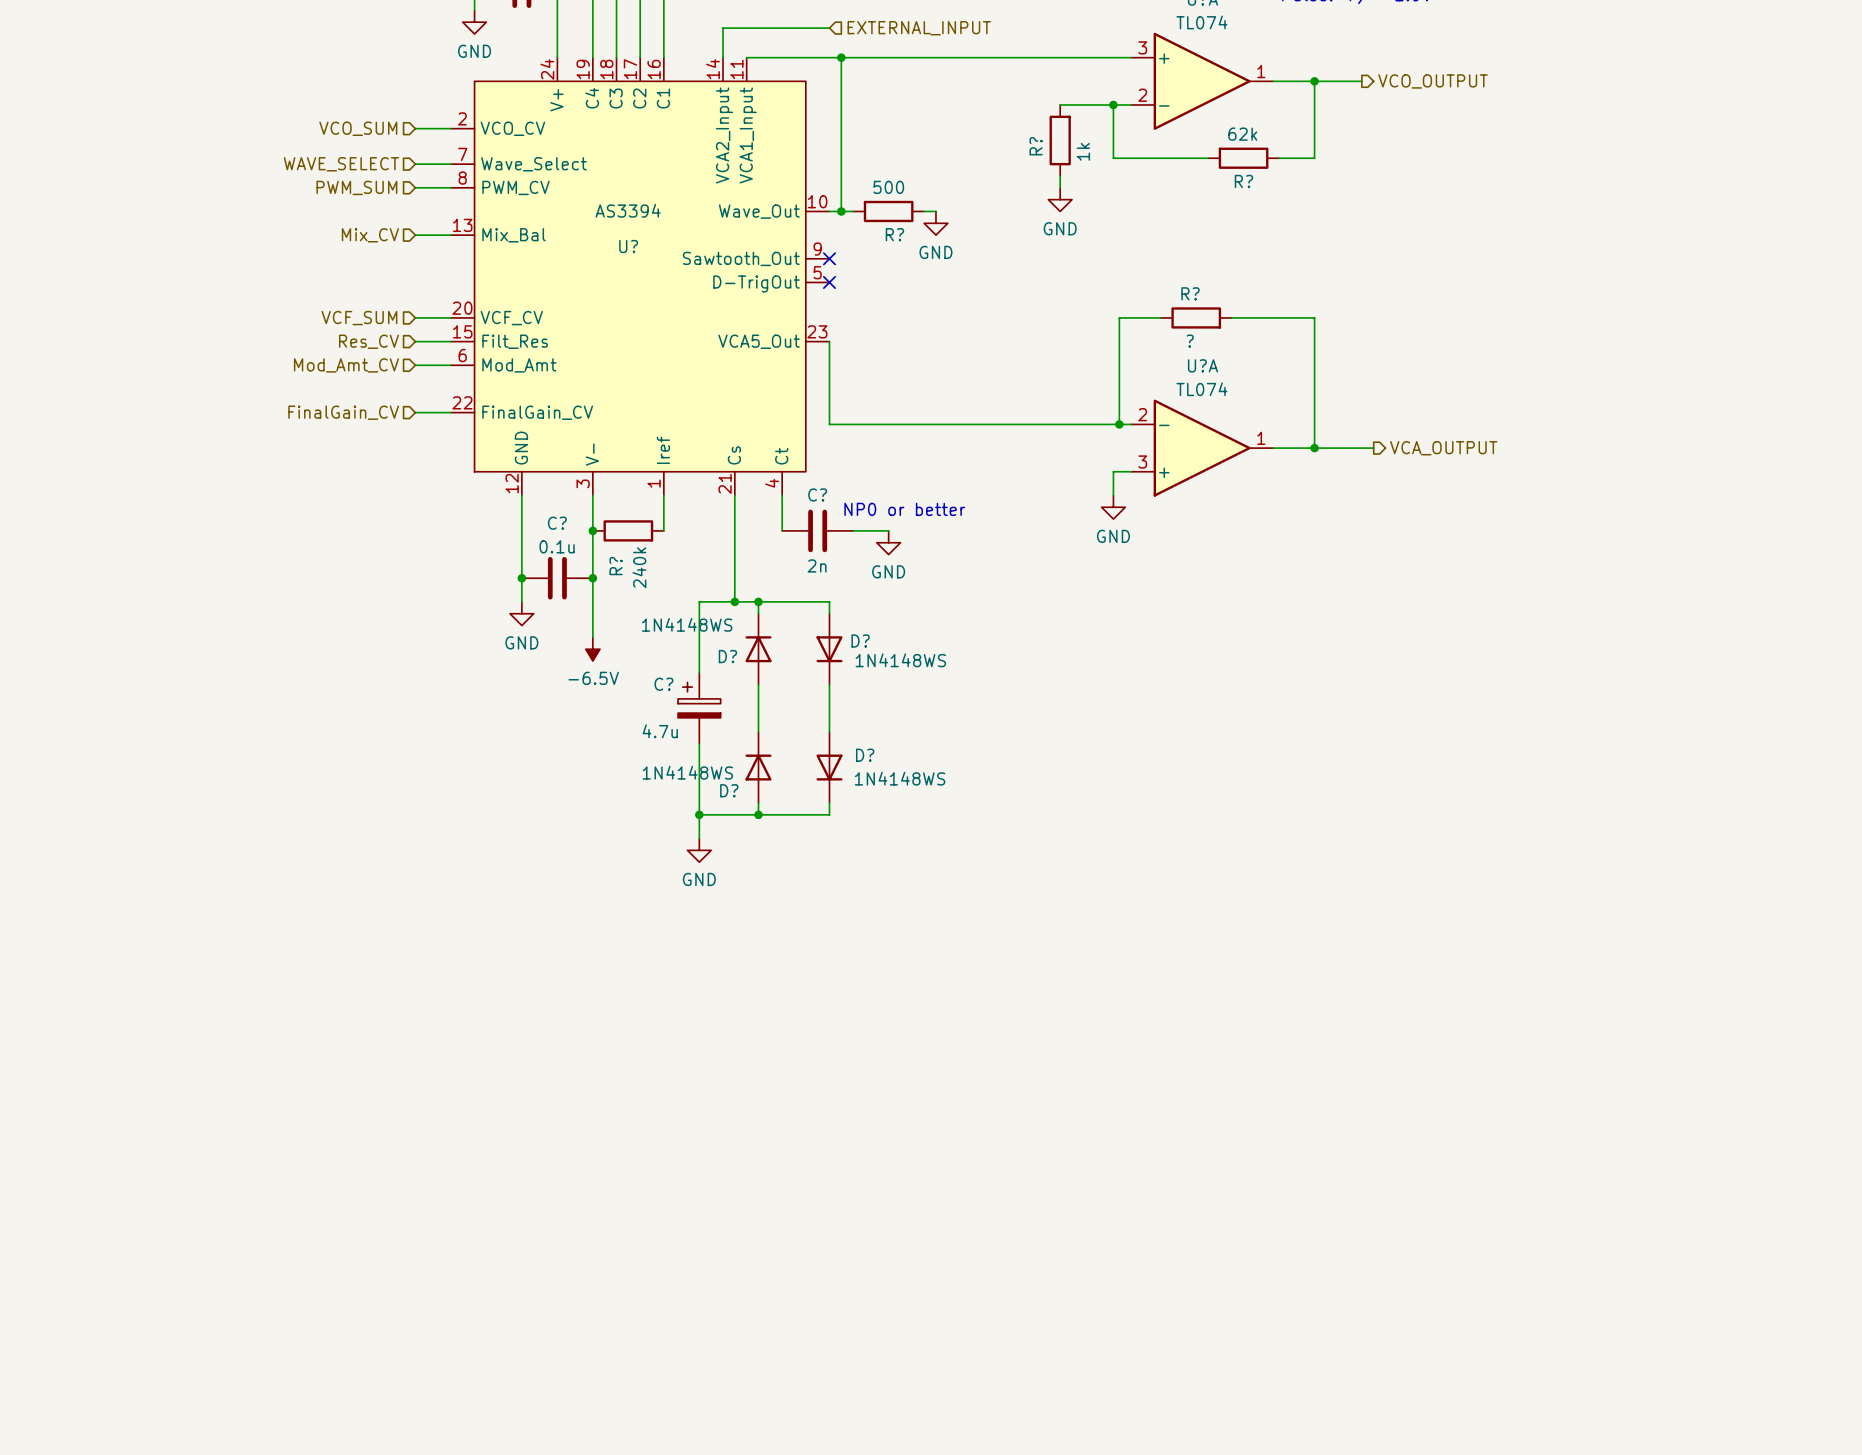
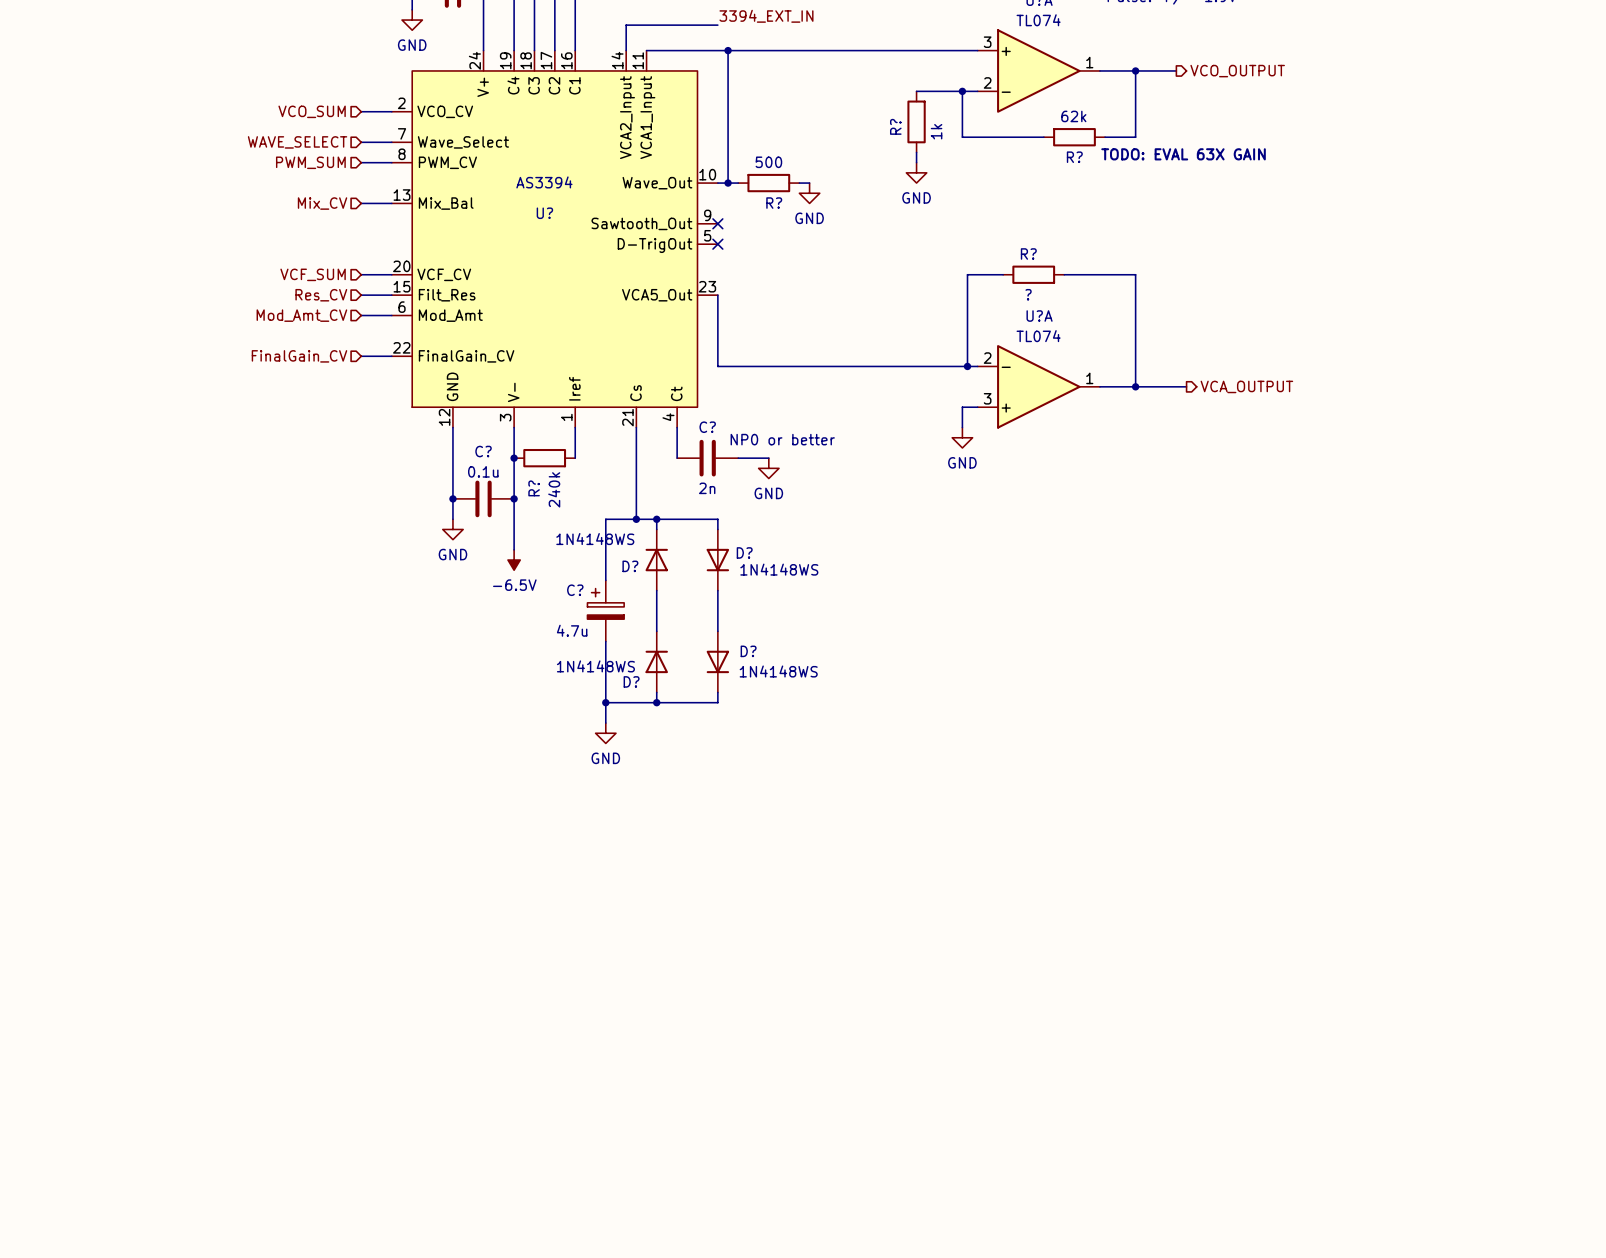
label: none -> 3394_EXT_IN (766, 16)
hierarchical label: EXTERNAL_INPUT (919, 28) -> none
text: none -> TODO: EVAL 63X GAIN (1183, 154)

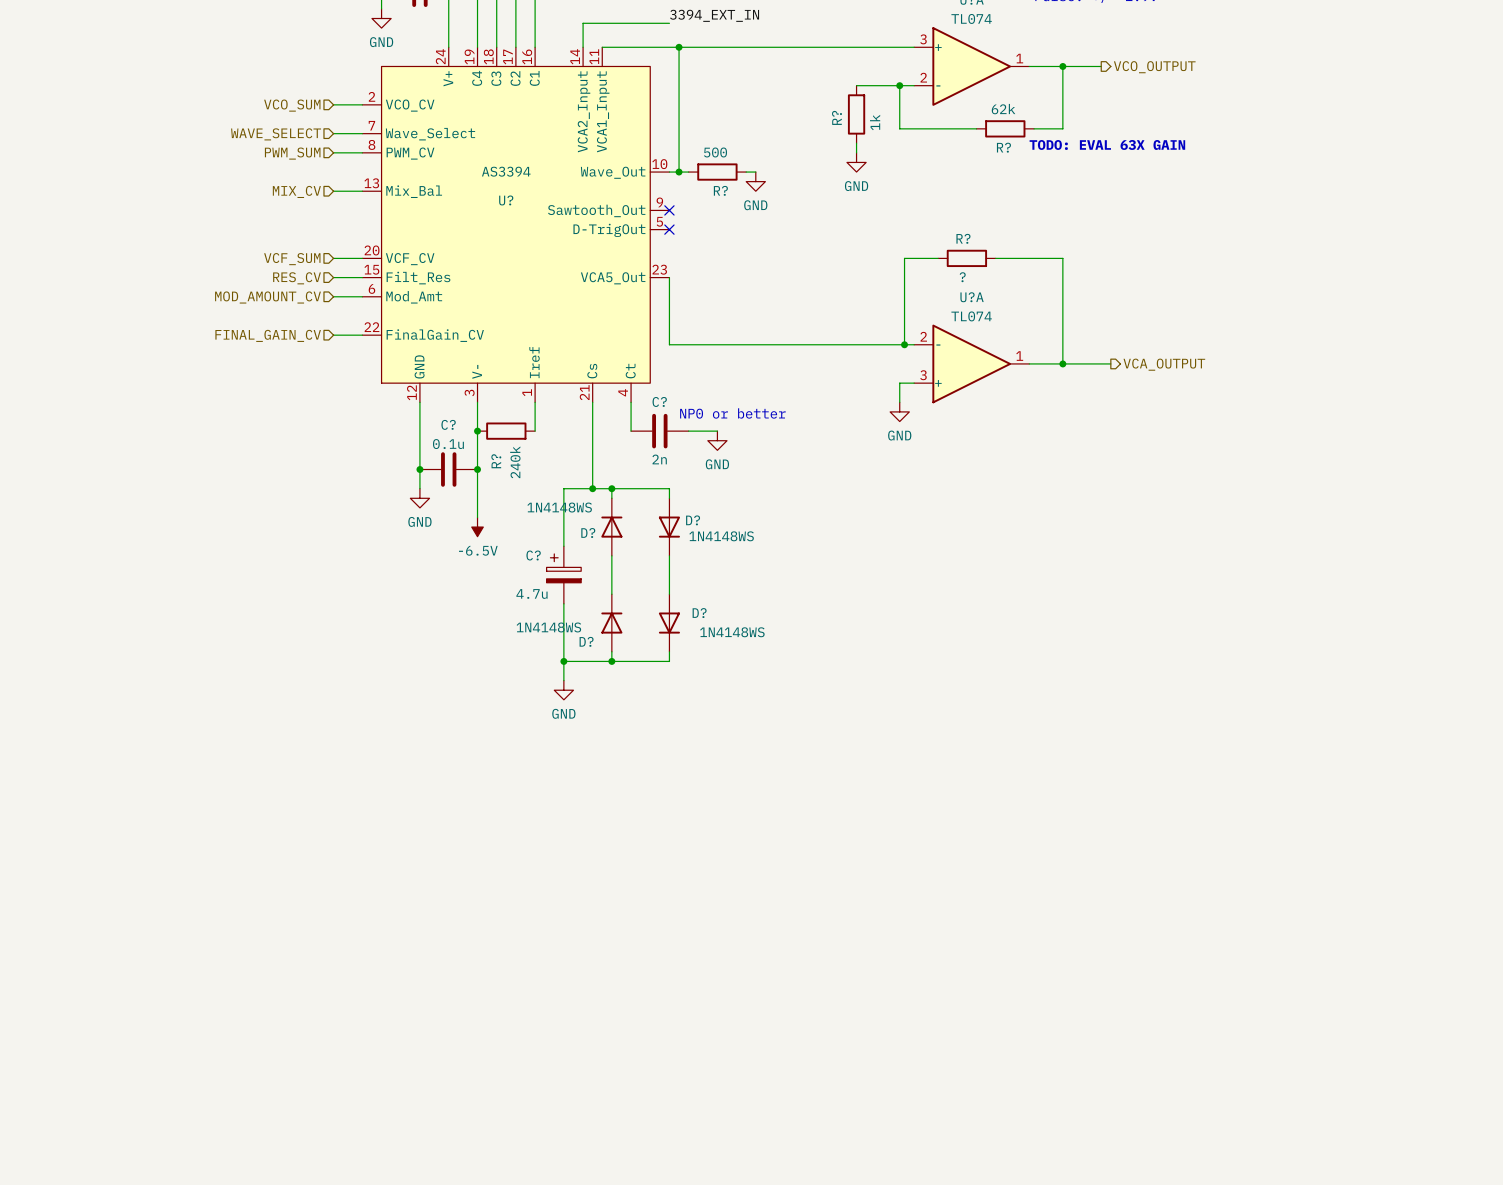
hierarchical label: Mix_CV (322, 203) -> MIX_CV (296, 191)
hierarchical label: Res_CV (321, 295) -> RES_CV (297, 278)
hierarchical label: Mod_Amt_CV (301, 315) -> MOD_AMOUNT_CV (268, 297)
hierarchical label: FinalGain_CV (299, 356) -> FINAL_GAIN_CV (268, 335)

